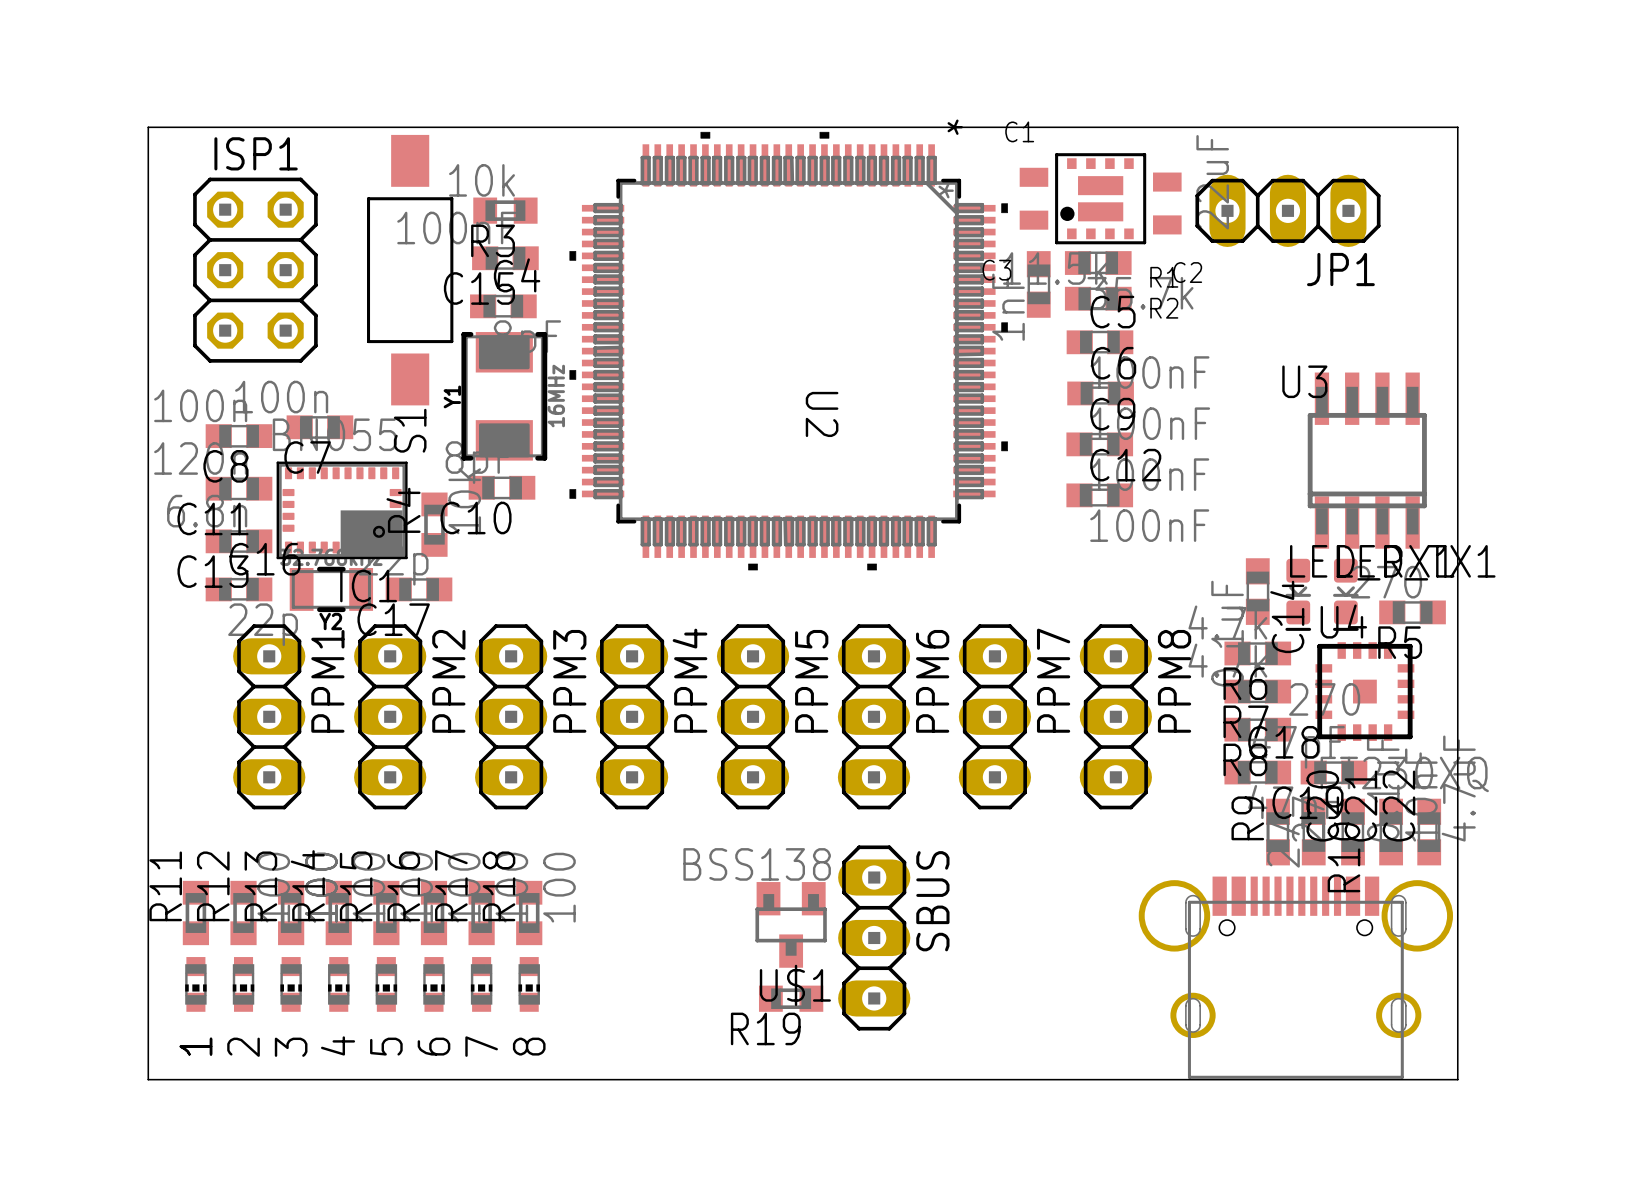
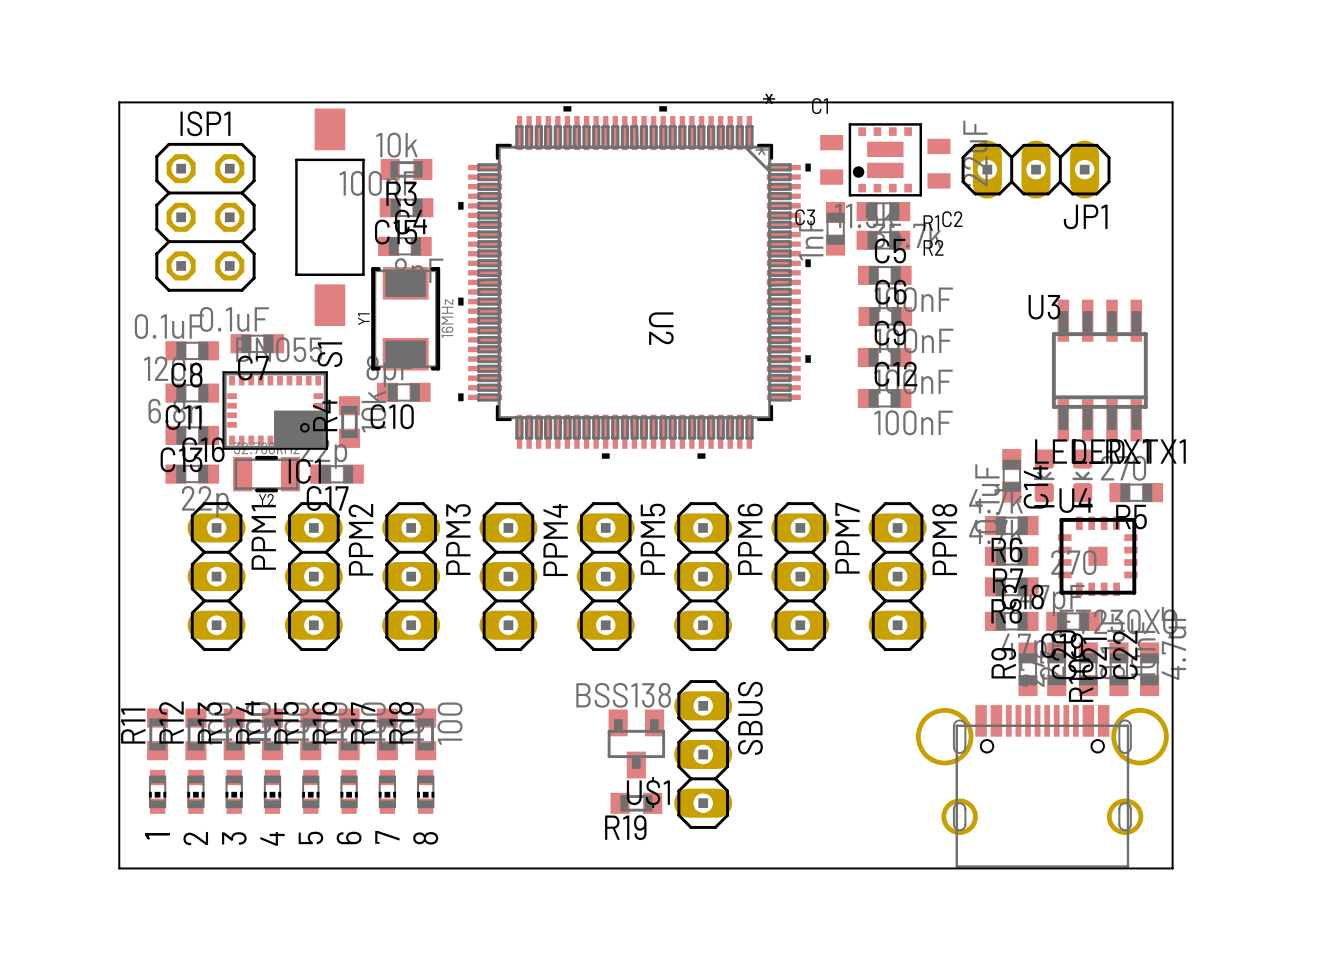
C7 value: 100n (281, 397) -> 0.1uF (234, 319)
C8 value: 100n (200, 405) -> 0.1uF (169, 326)

